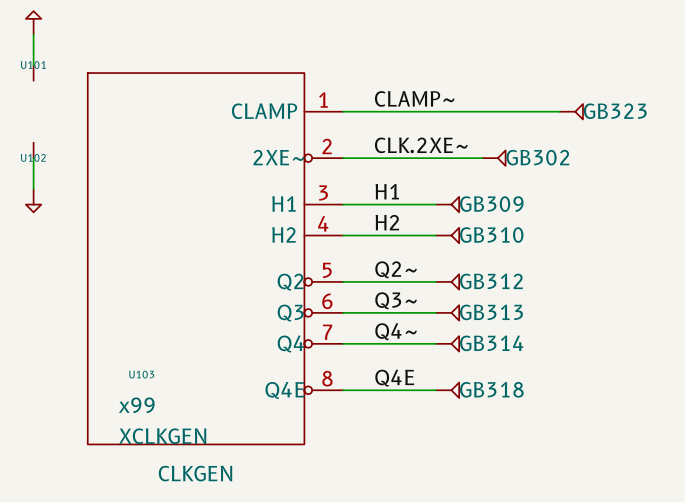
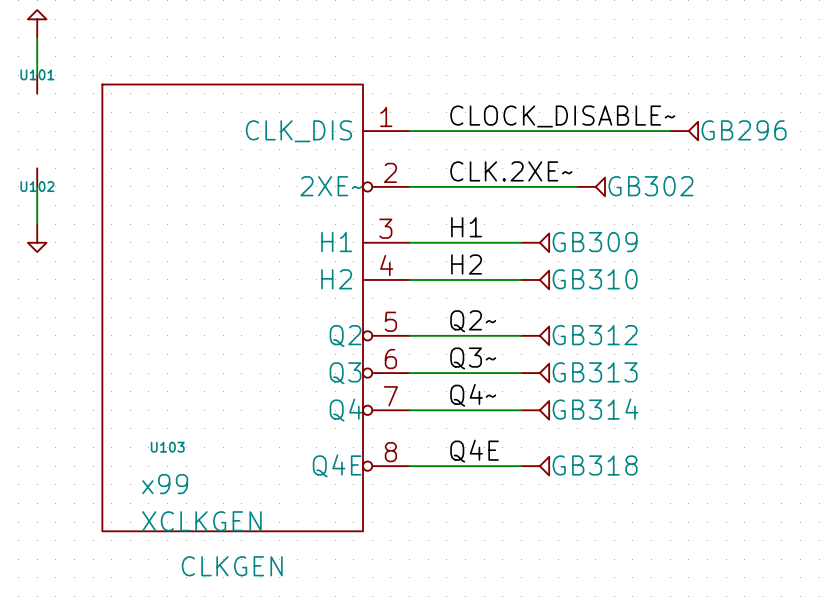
label: CLAMP~ (414, 98) -> CLOCK_DISABLE~ (562, 116)
U103 pin name: CLAMP (264, 111) -> CLK_DIS (298, 131)
GB323 name: GB323 (615, 111) -> GB296 (744, 130)

